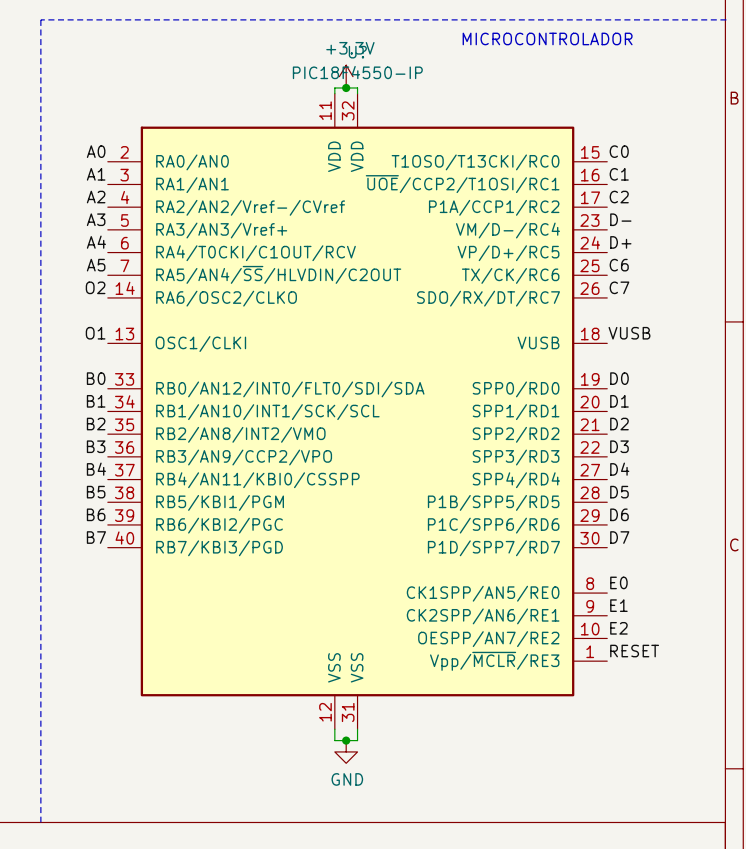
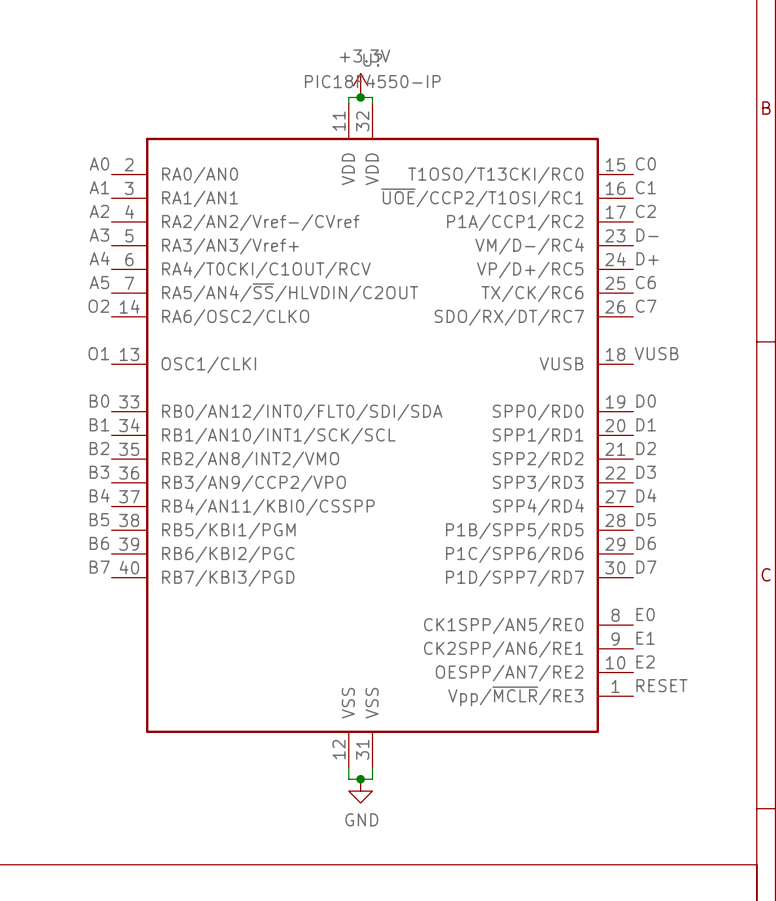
line: (726, 19) (40, 19) (40, 822) -> none
text: MICROCONTROLADOR (547, 38) -> none

